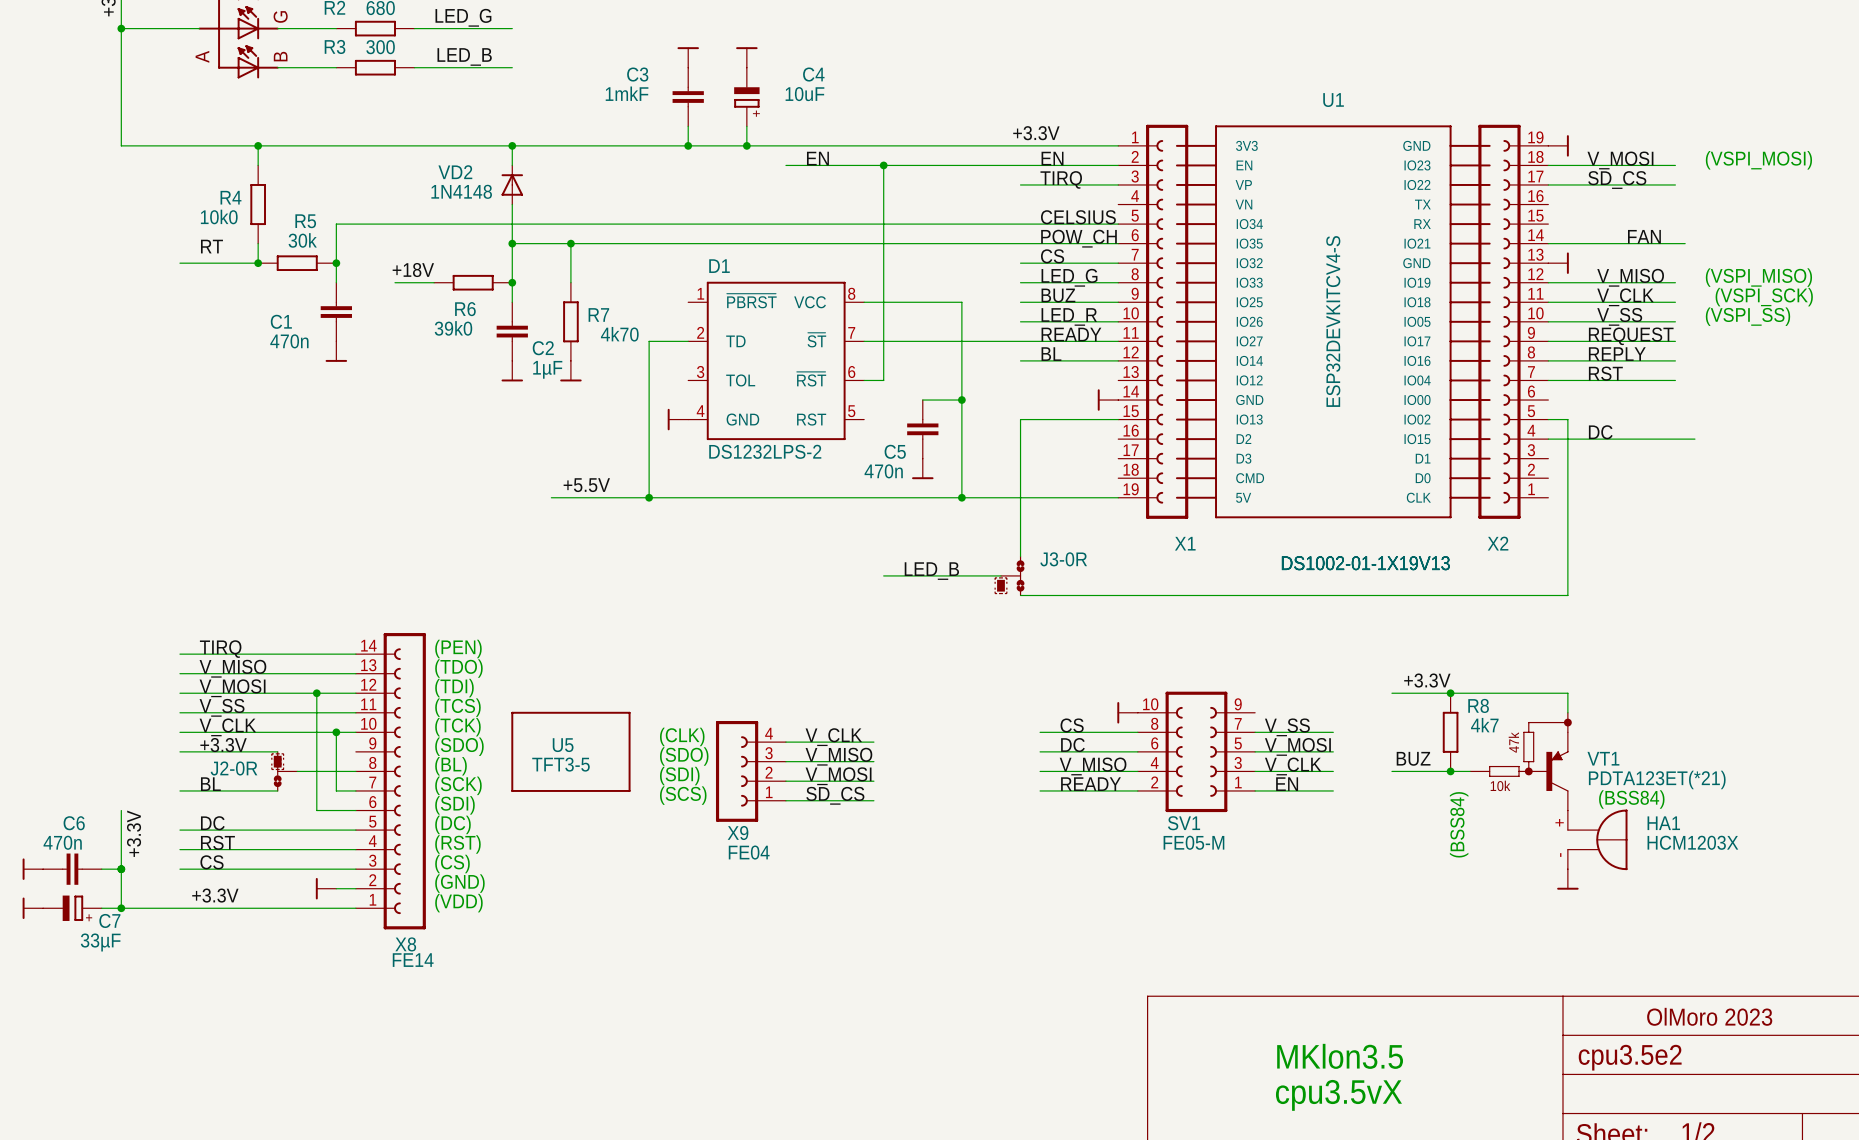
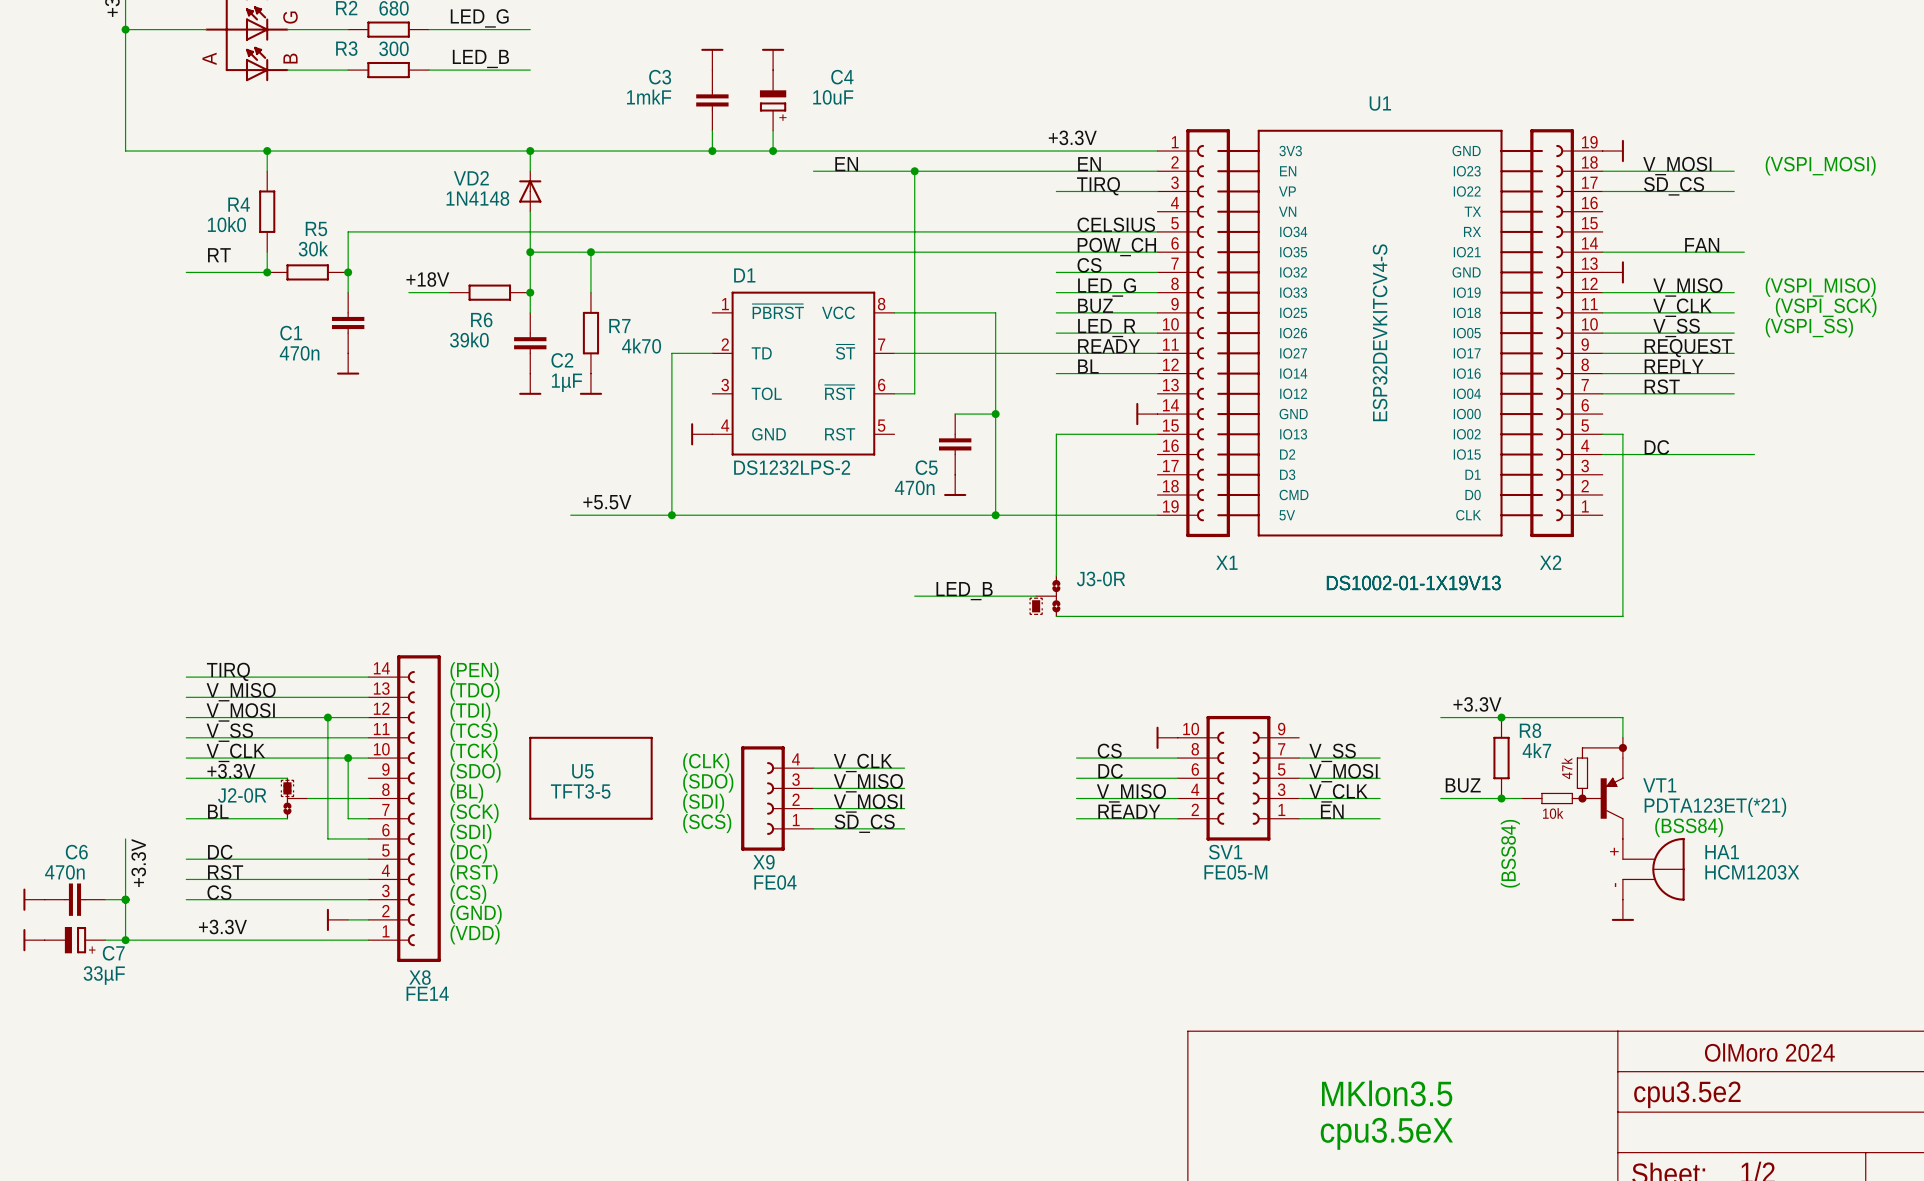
text: OlMoro 2023 (1709, 1016) -> OlMoro 2024 (1769, 1052)
text: cpu3.5vX (1338, 1095) -> cpu3.5eX (1386, 1133)

